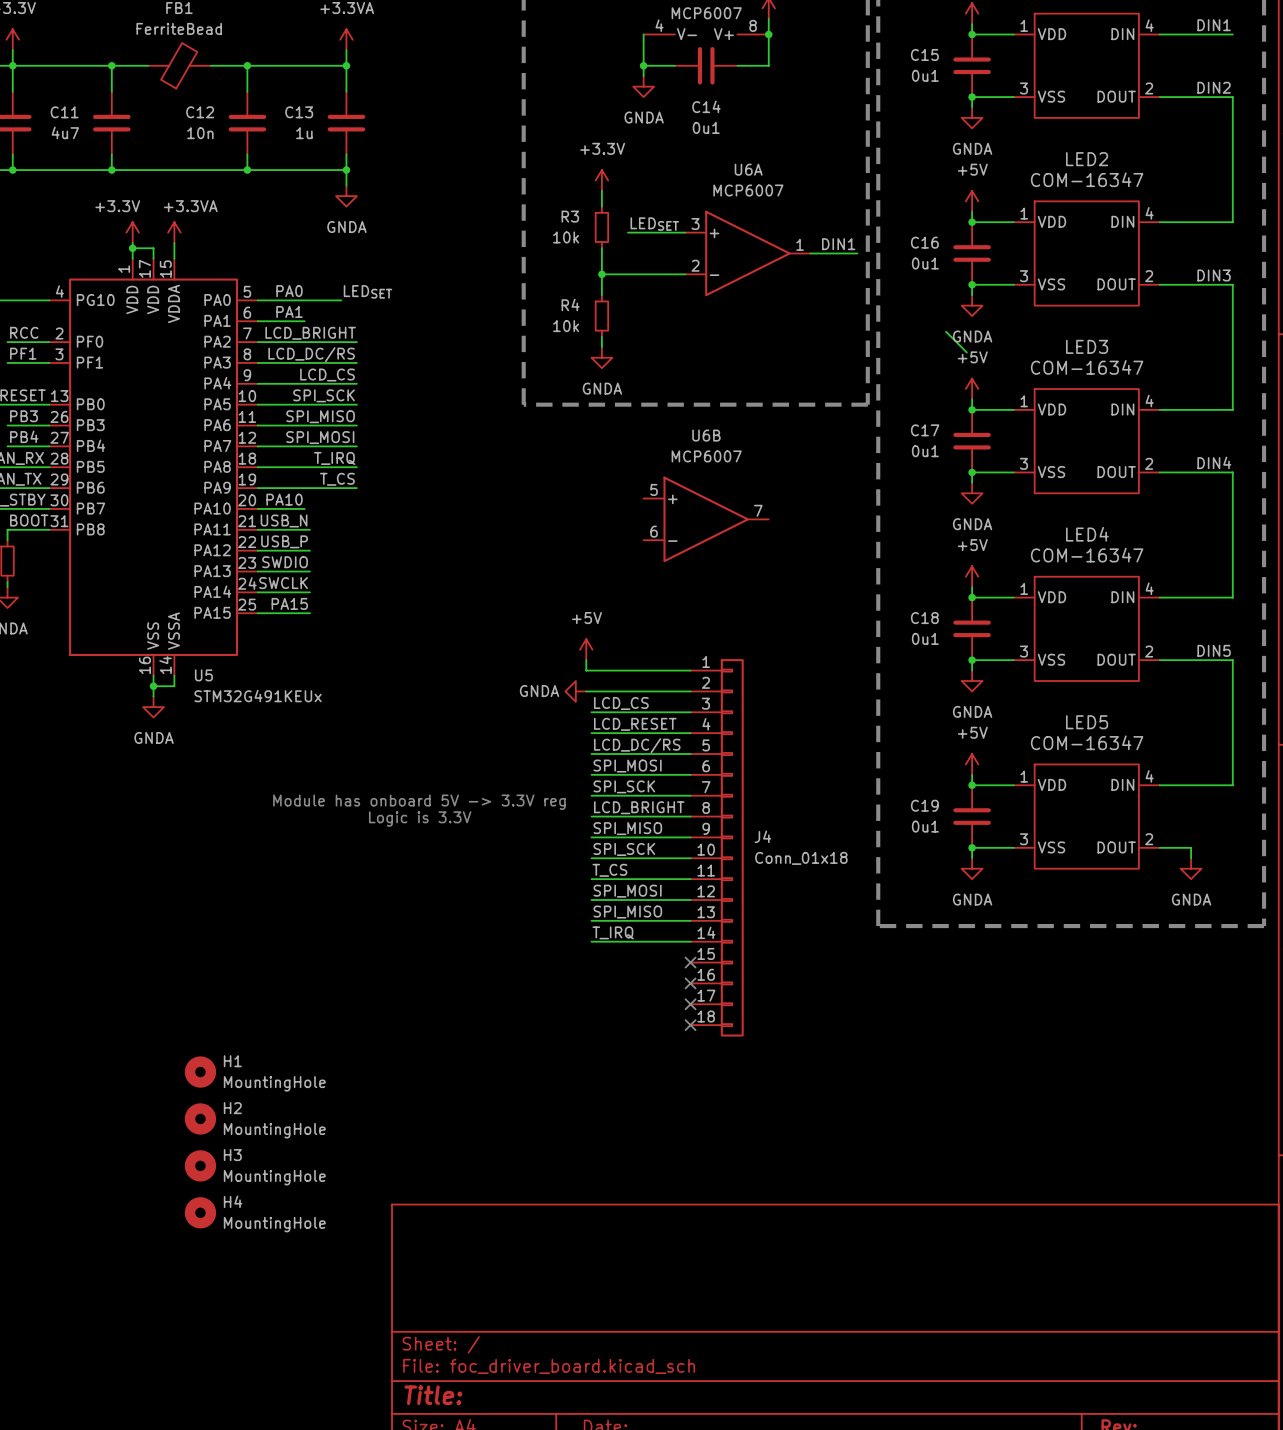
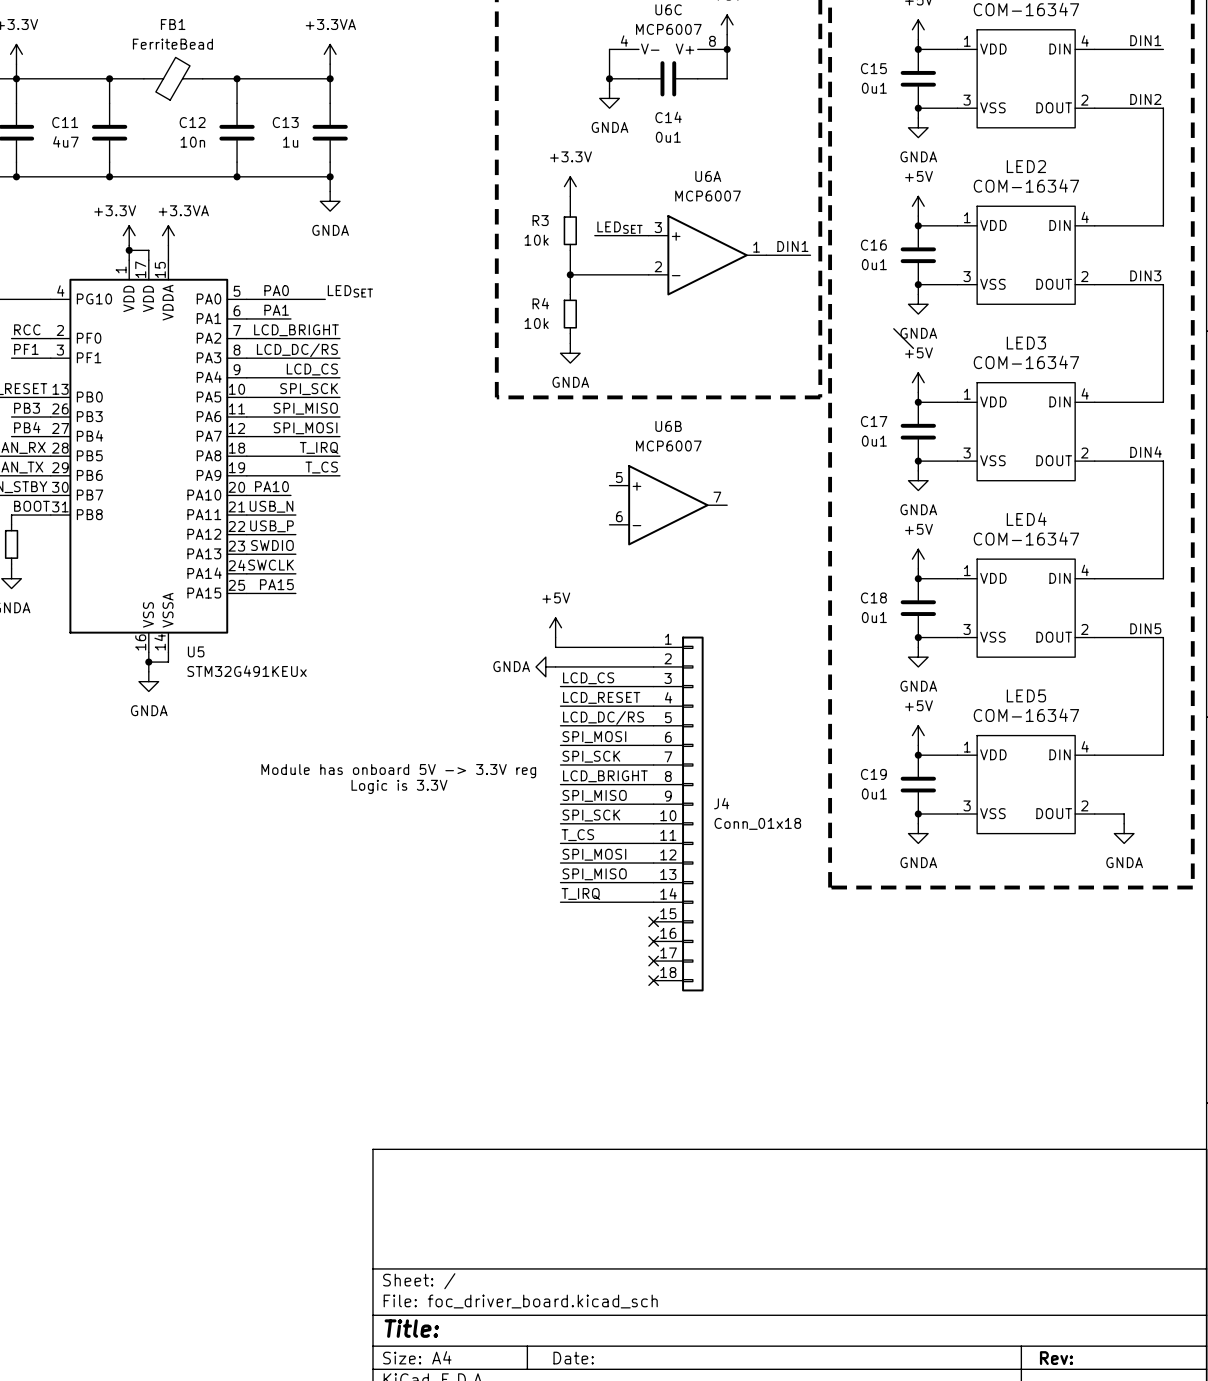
H1: MountingHole (200, 1072) -> none
H2: MountingHole (200, 1118) -> none
H3: MountingHole (200, 1165) -> none
H4: MountingHole (200, 1212) -> none

